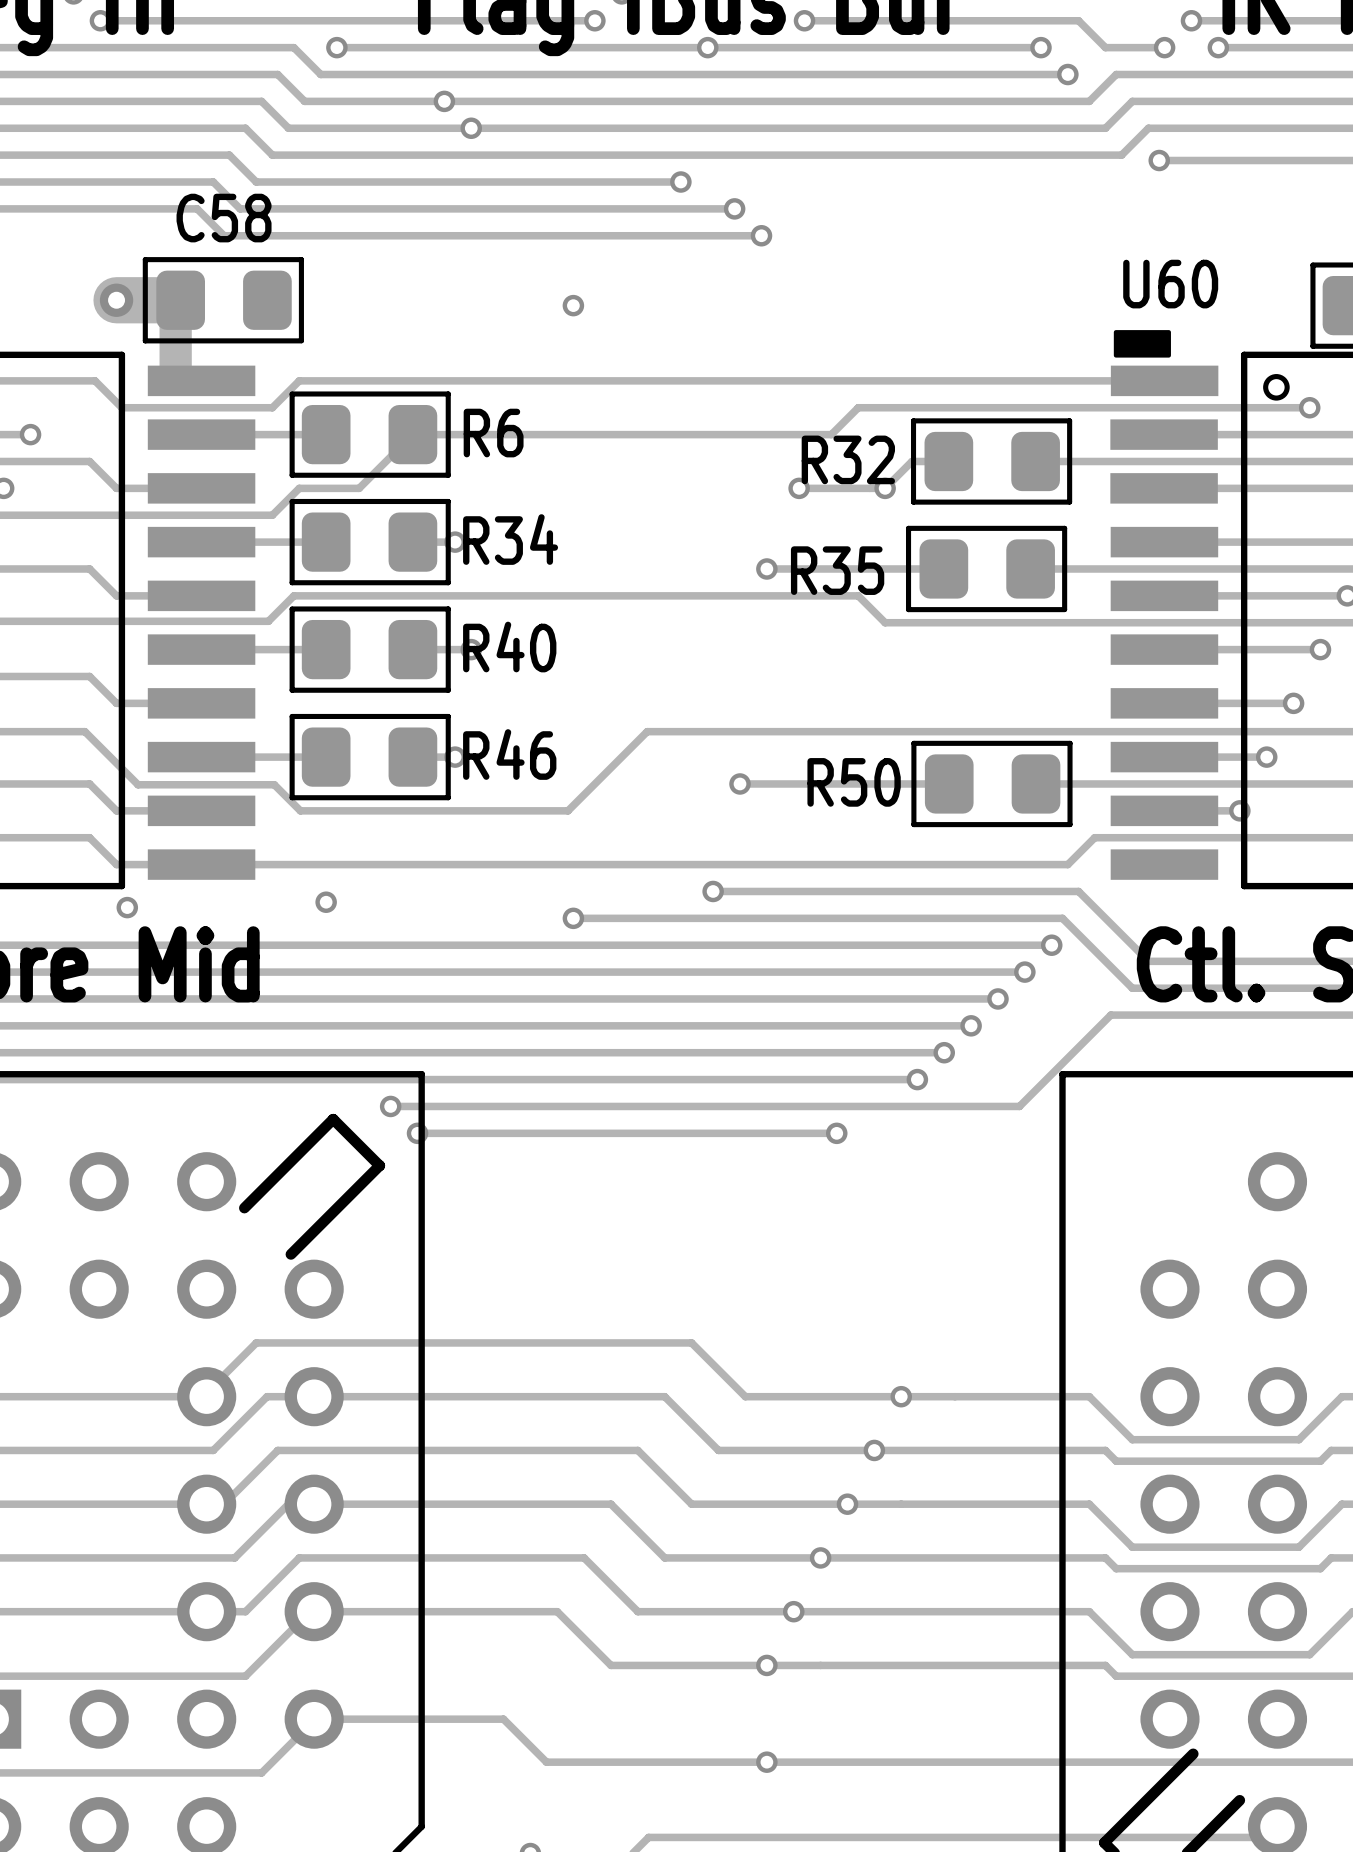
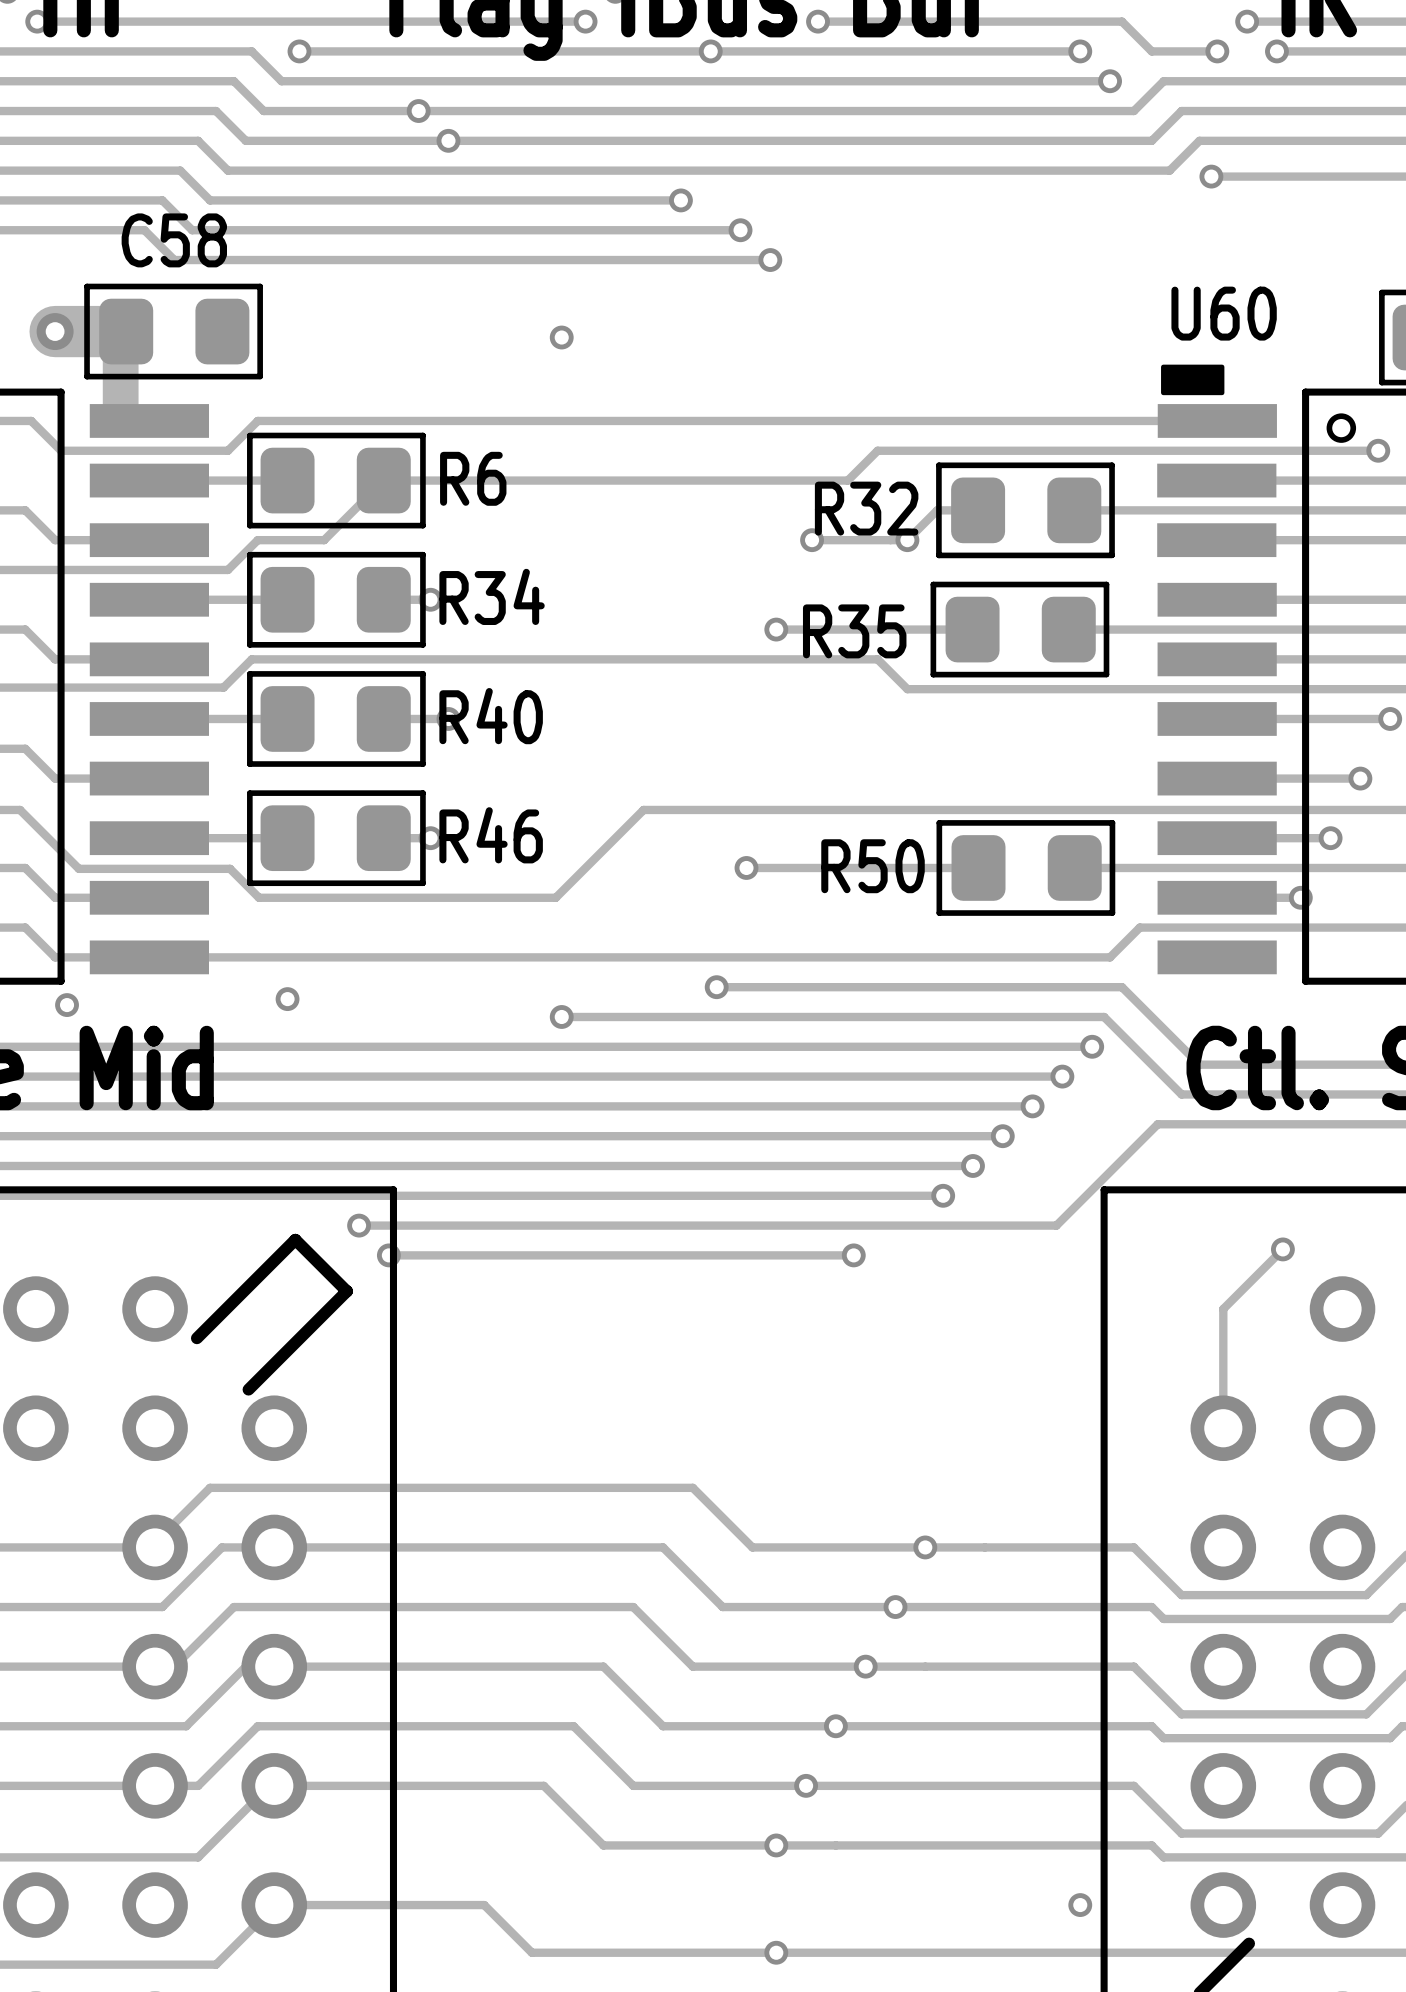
track: none -> (1282, 1249) (1223, 1309) (1223, 1428)
via: none -> (1282, 1249)
via: none -> (1080, 1905)

